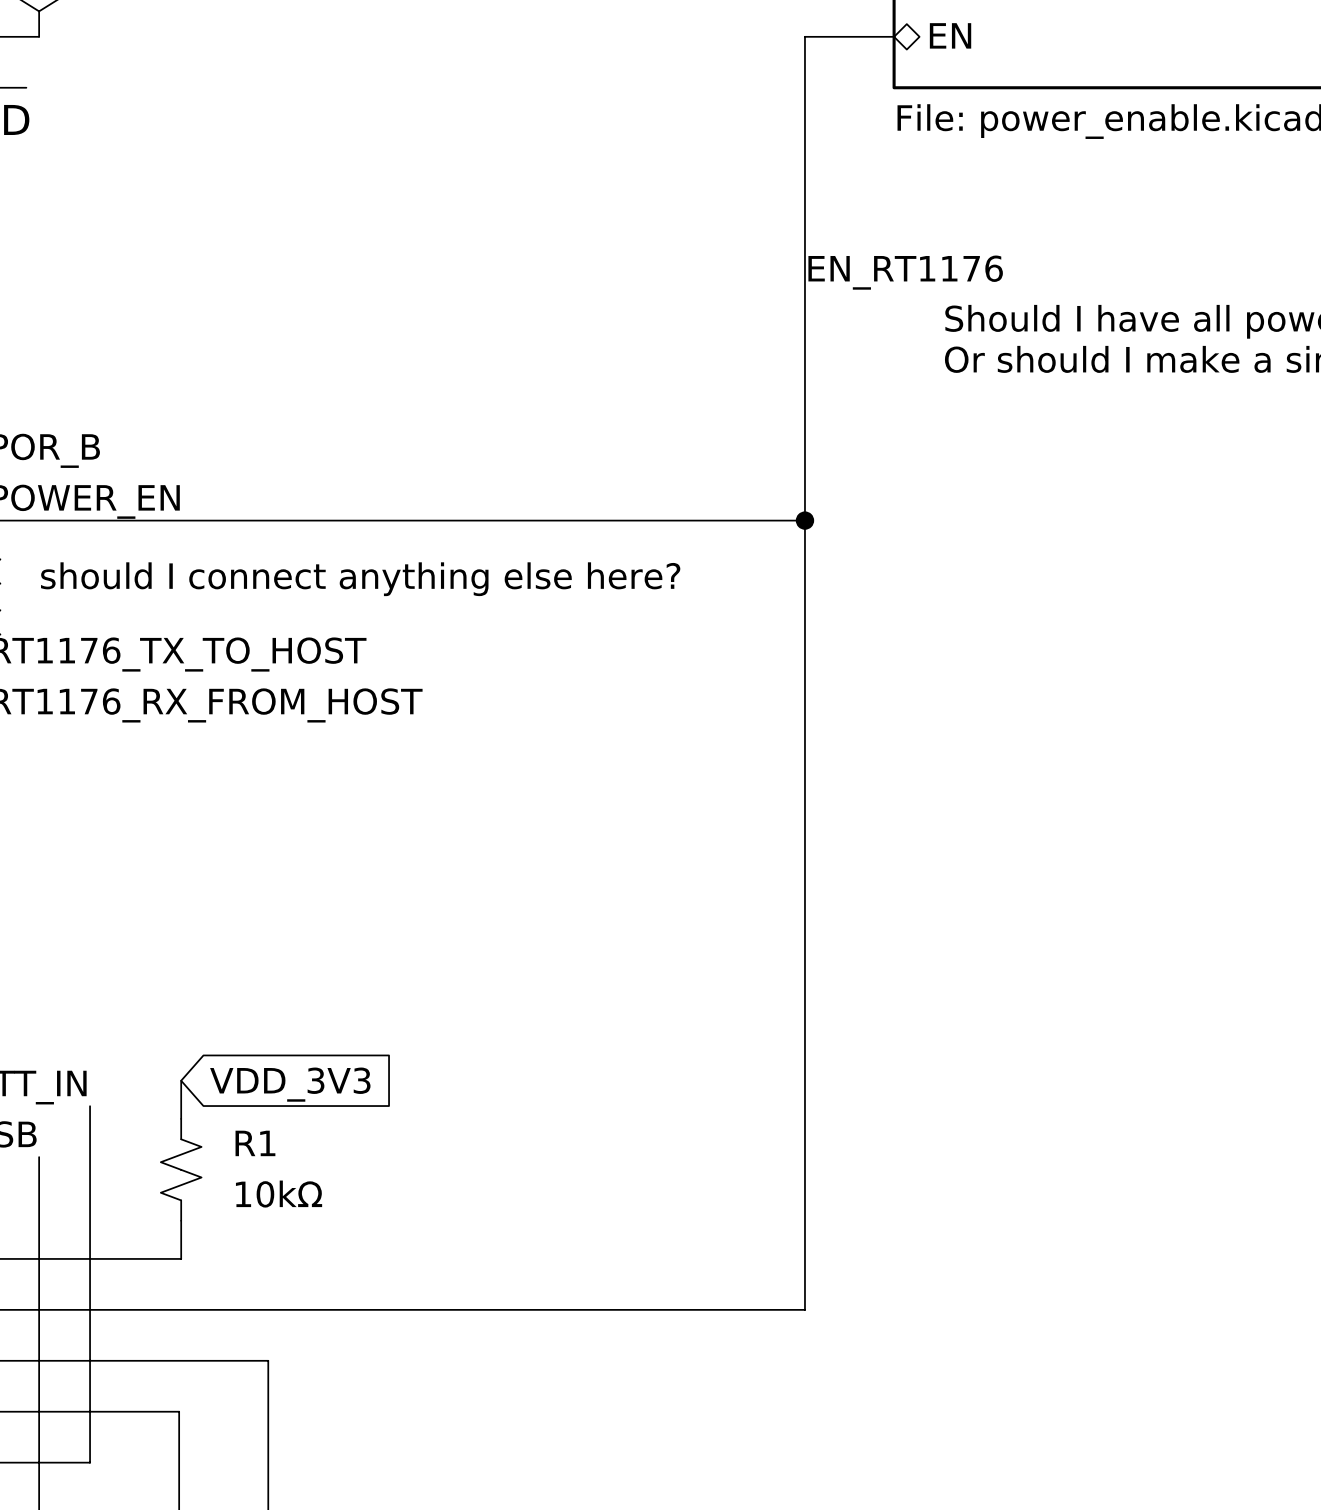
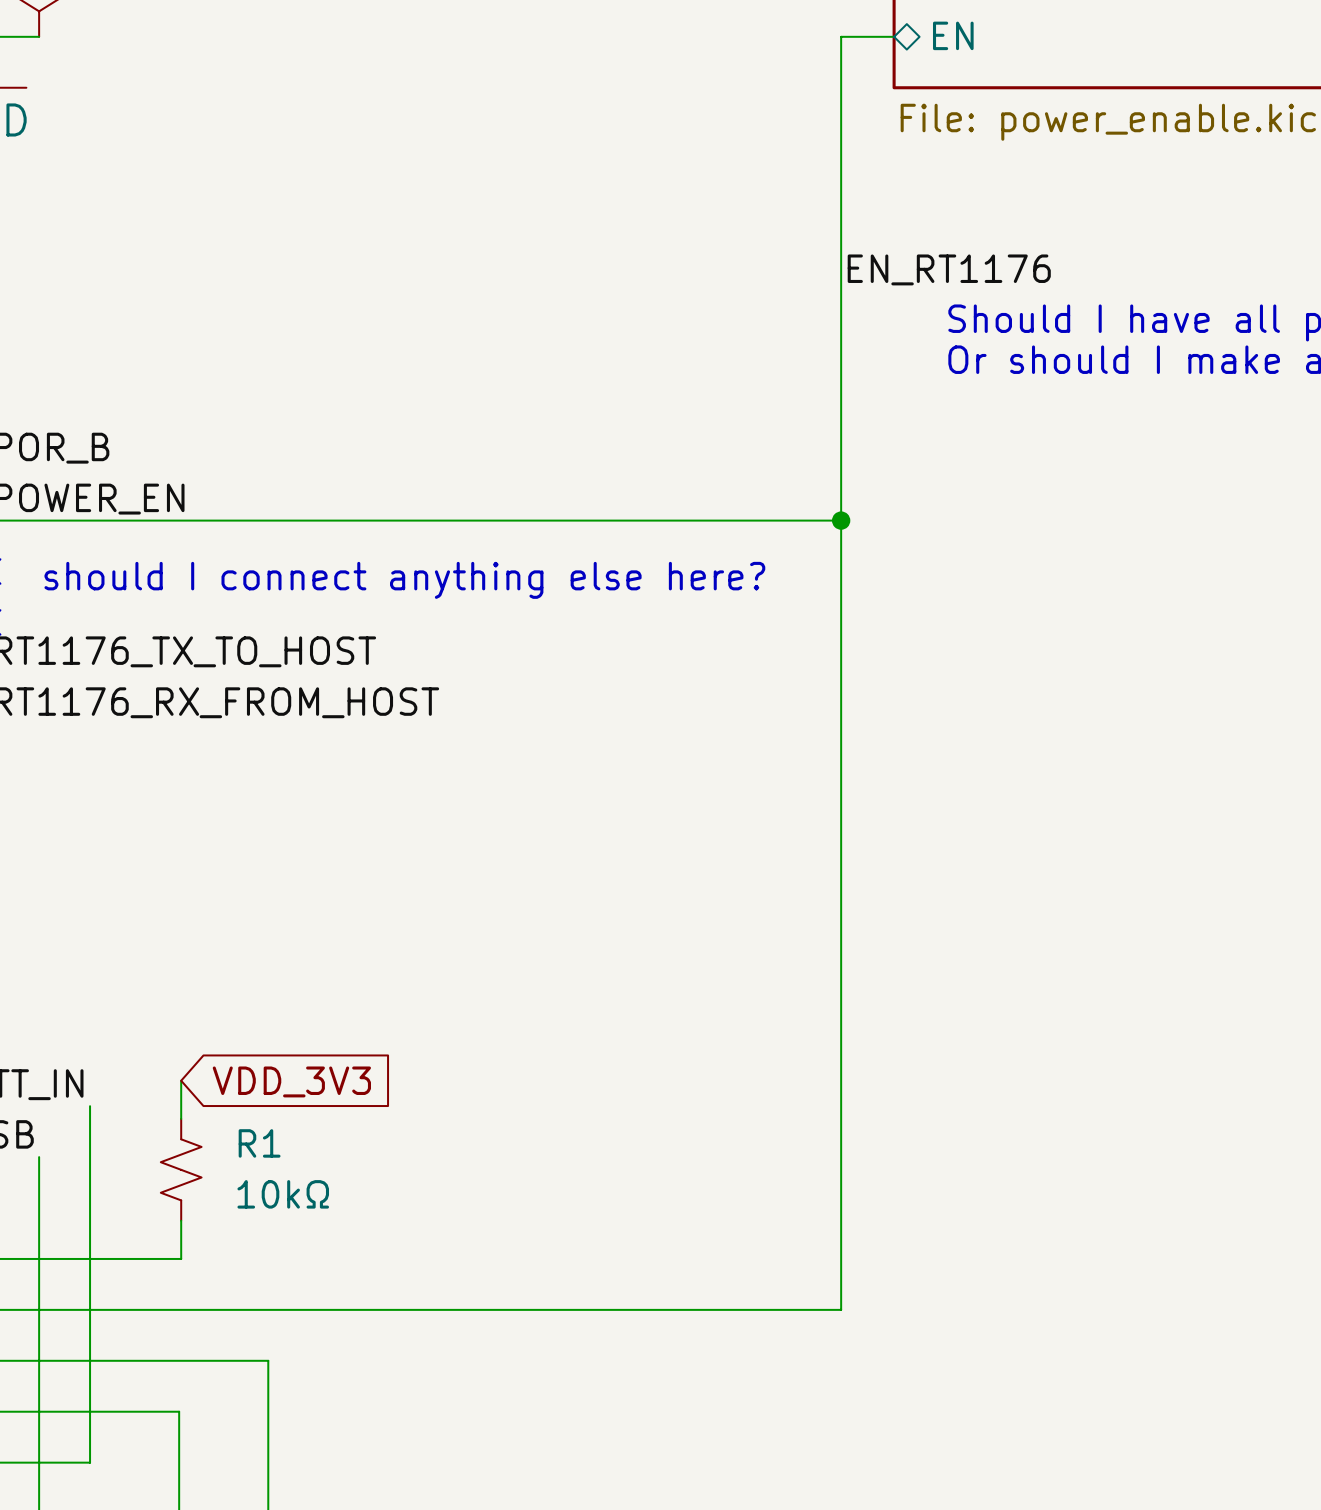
wire: (841, 36) (804, 36) (804, 1309) -> (841, 36) (841, 1309) (804, 1309)
label position: EN_RT1176 (905, 272) -> EN_RT1176 (949, 269)
wire: none -> (804, 520) (841, 520)
junction position: (804, 520) -> (841, 520)

